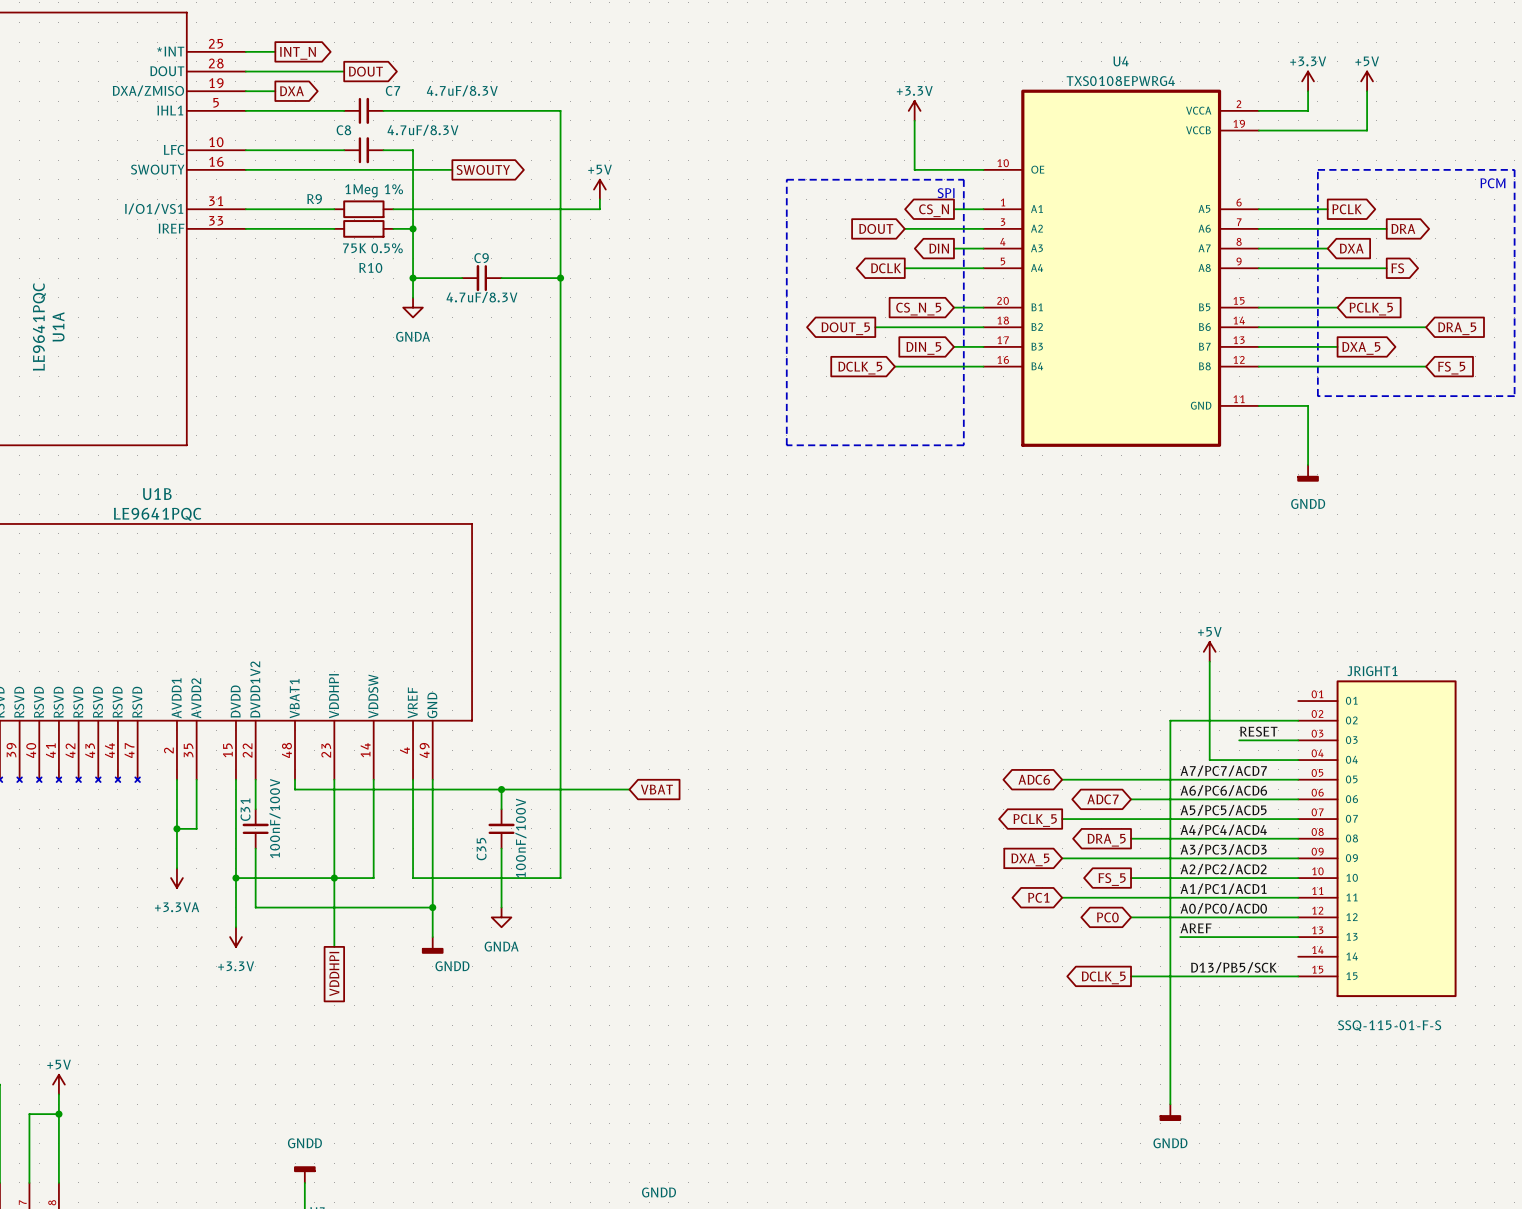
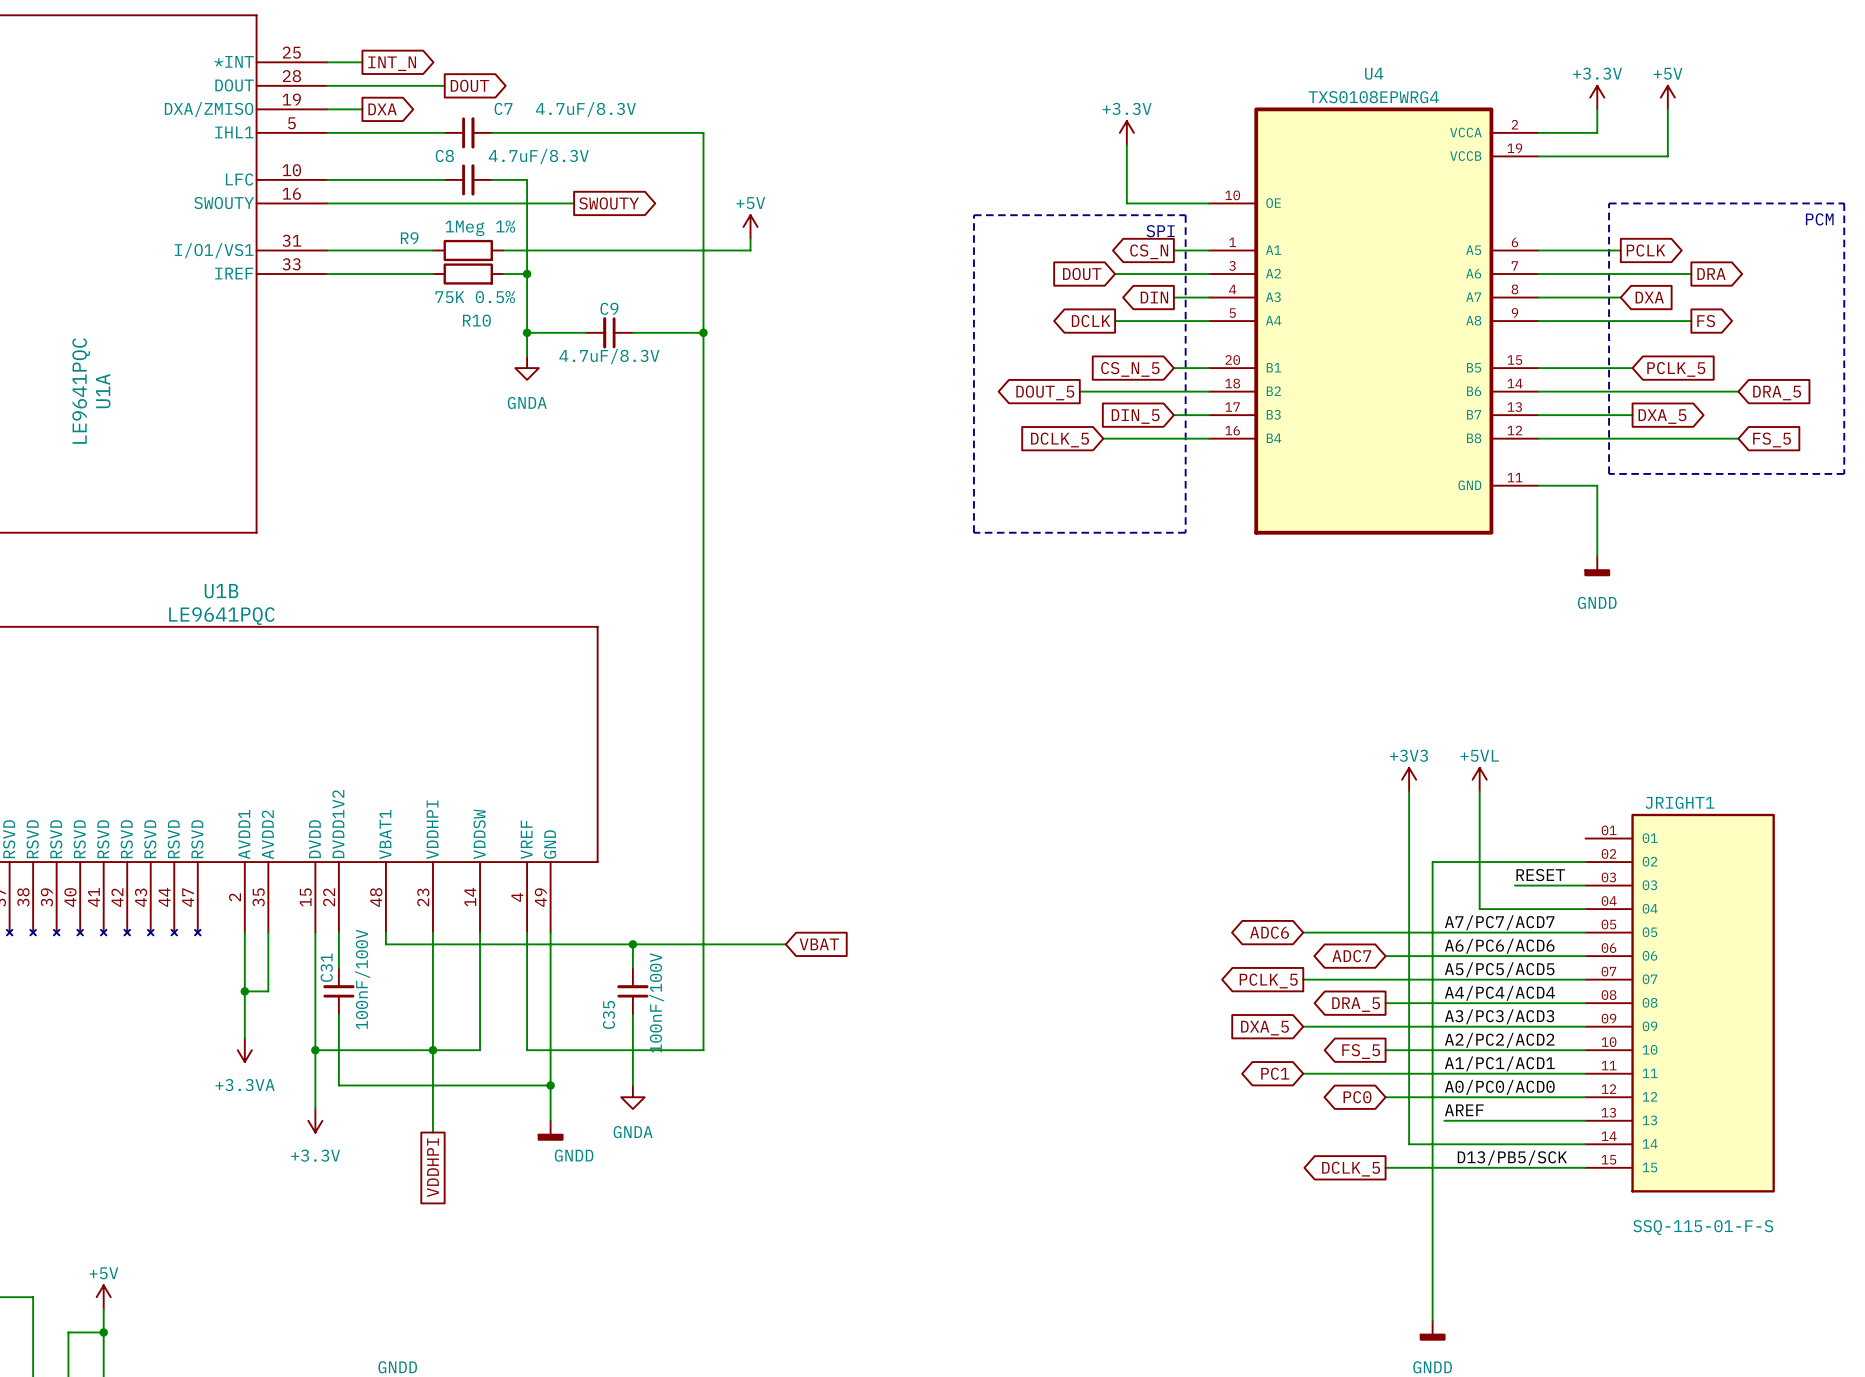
power symbol: none -> +3V3 (1409, 779)
power symbol: +5V (1209, 651) -> +5VL (1479, 779)
wire: none -> (1409, 791) (1409, 1144) (1585, 1144)

